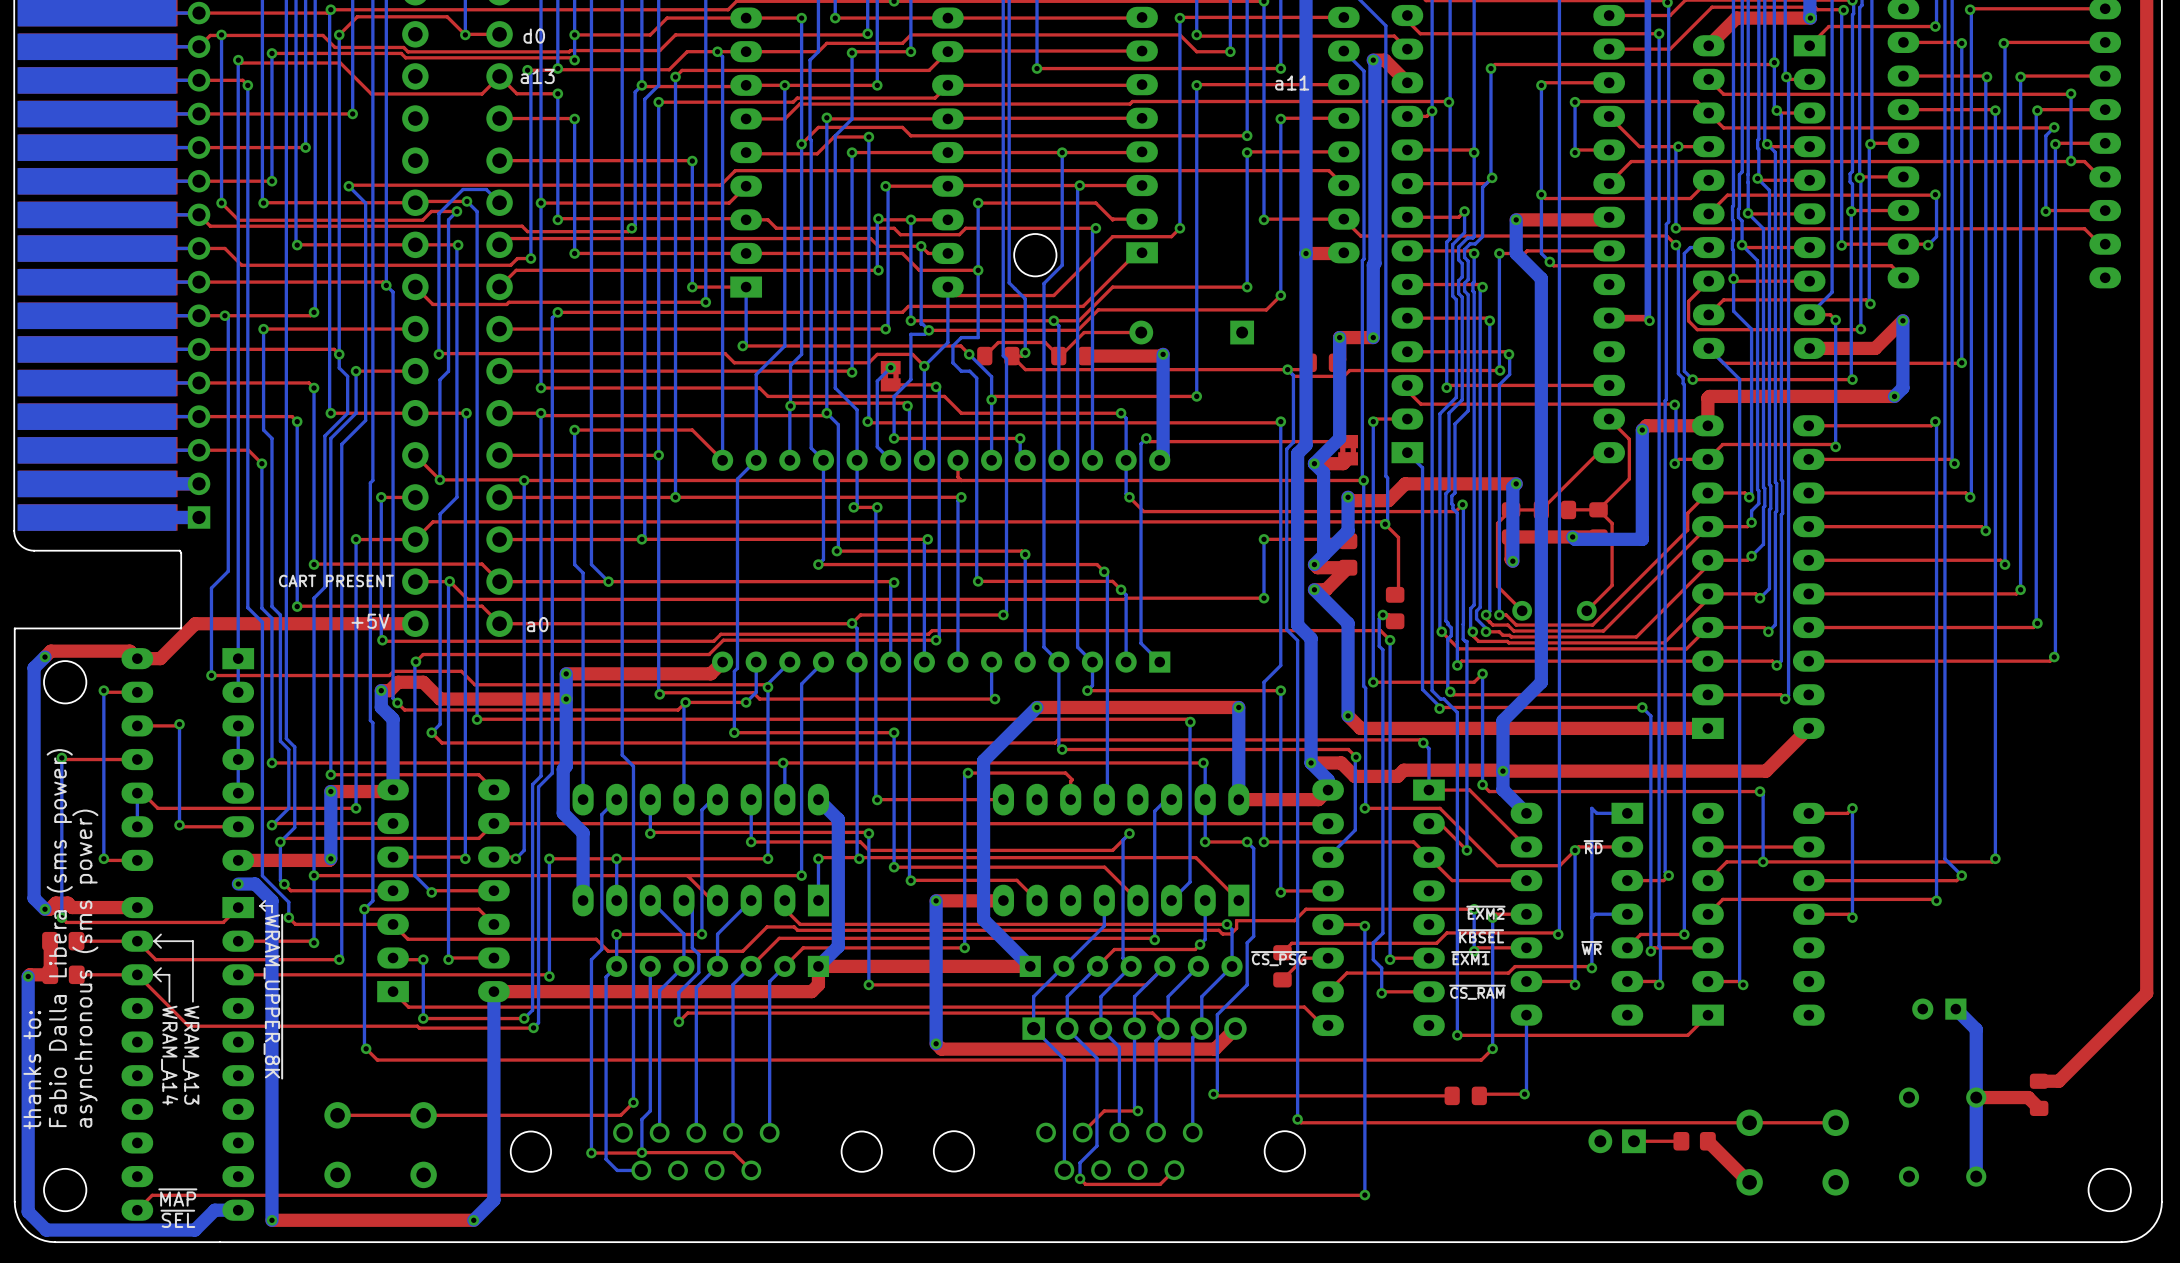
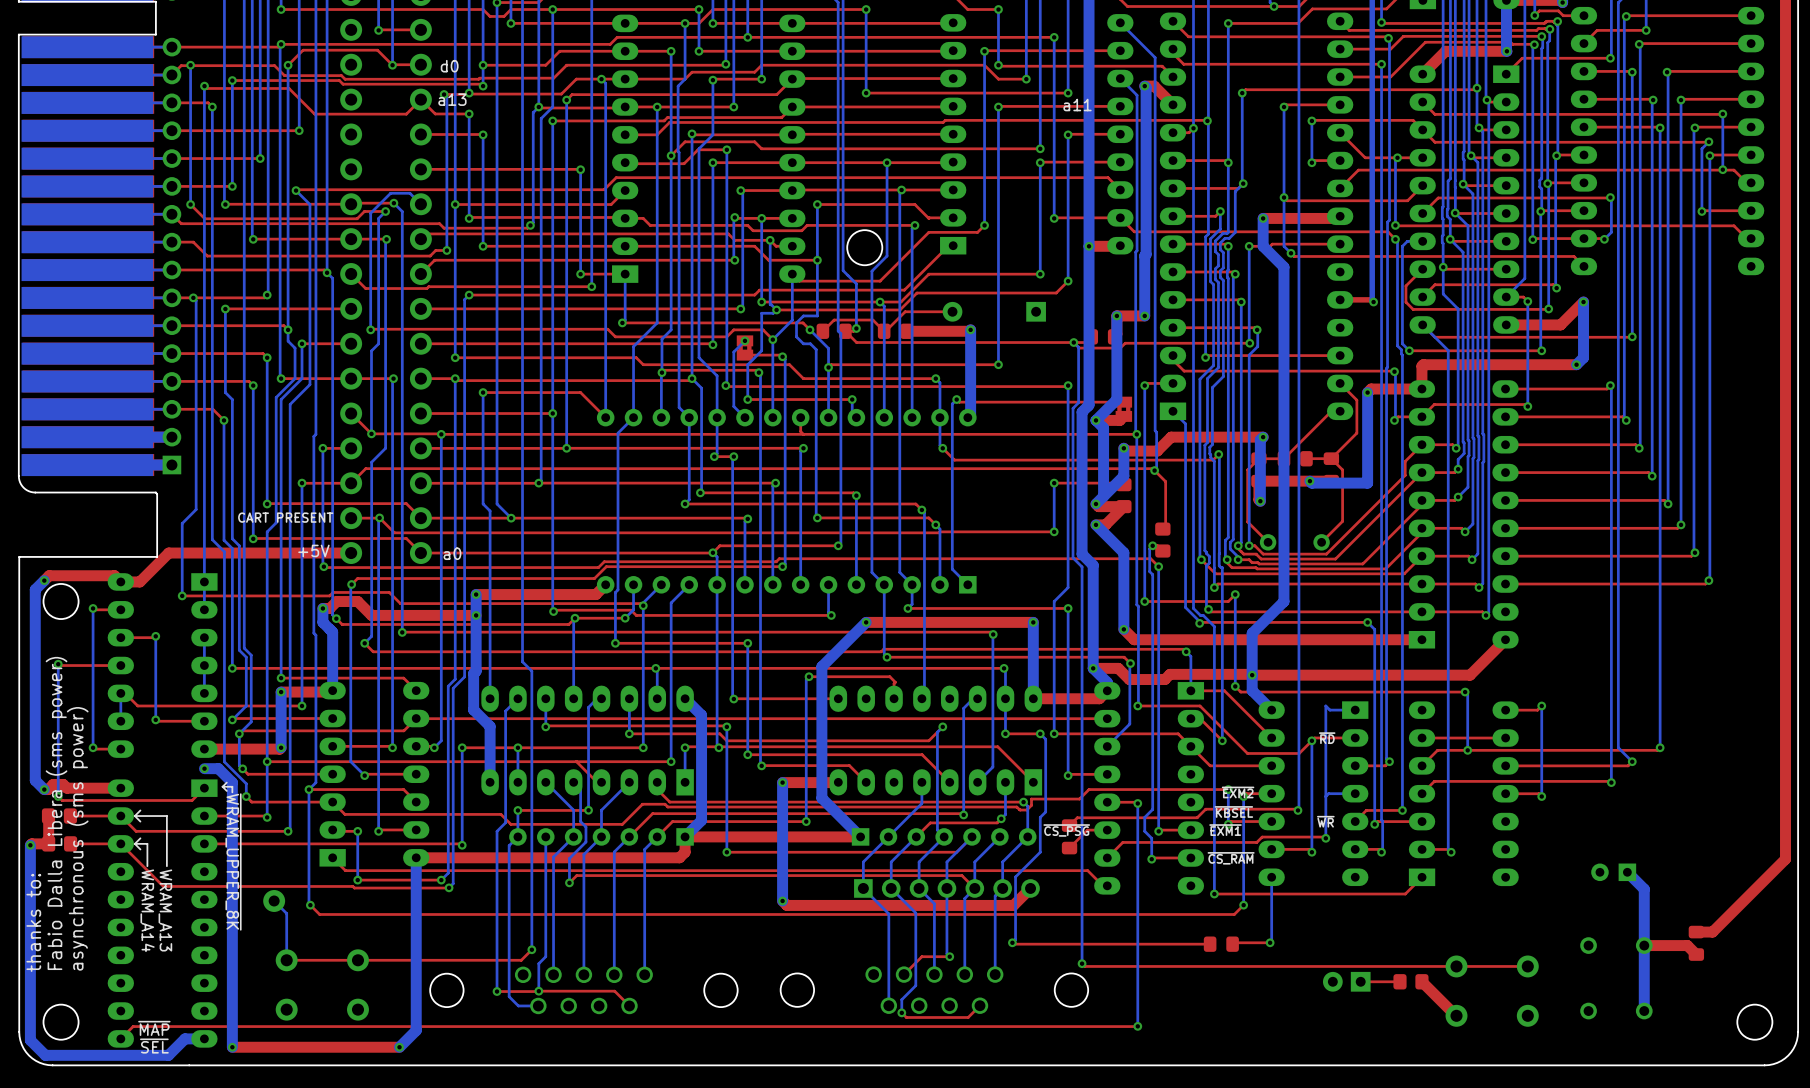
bottom track: none -> (274, 900) (286, 913) (286, 960)
part: none -> (274, 900)

